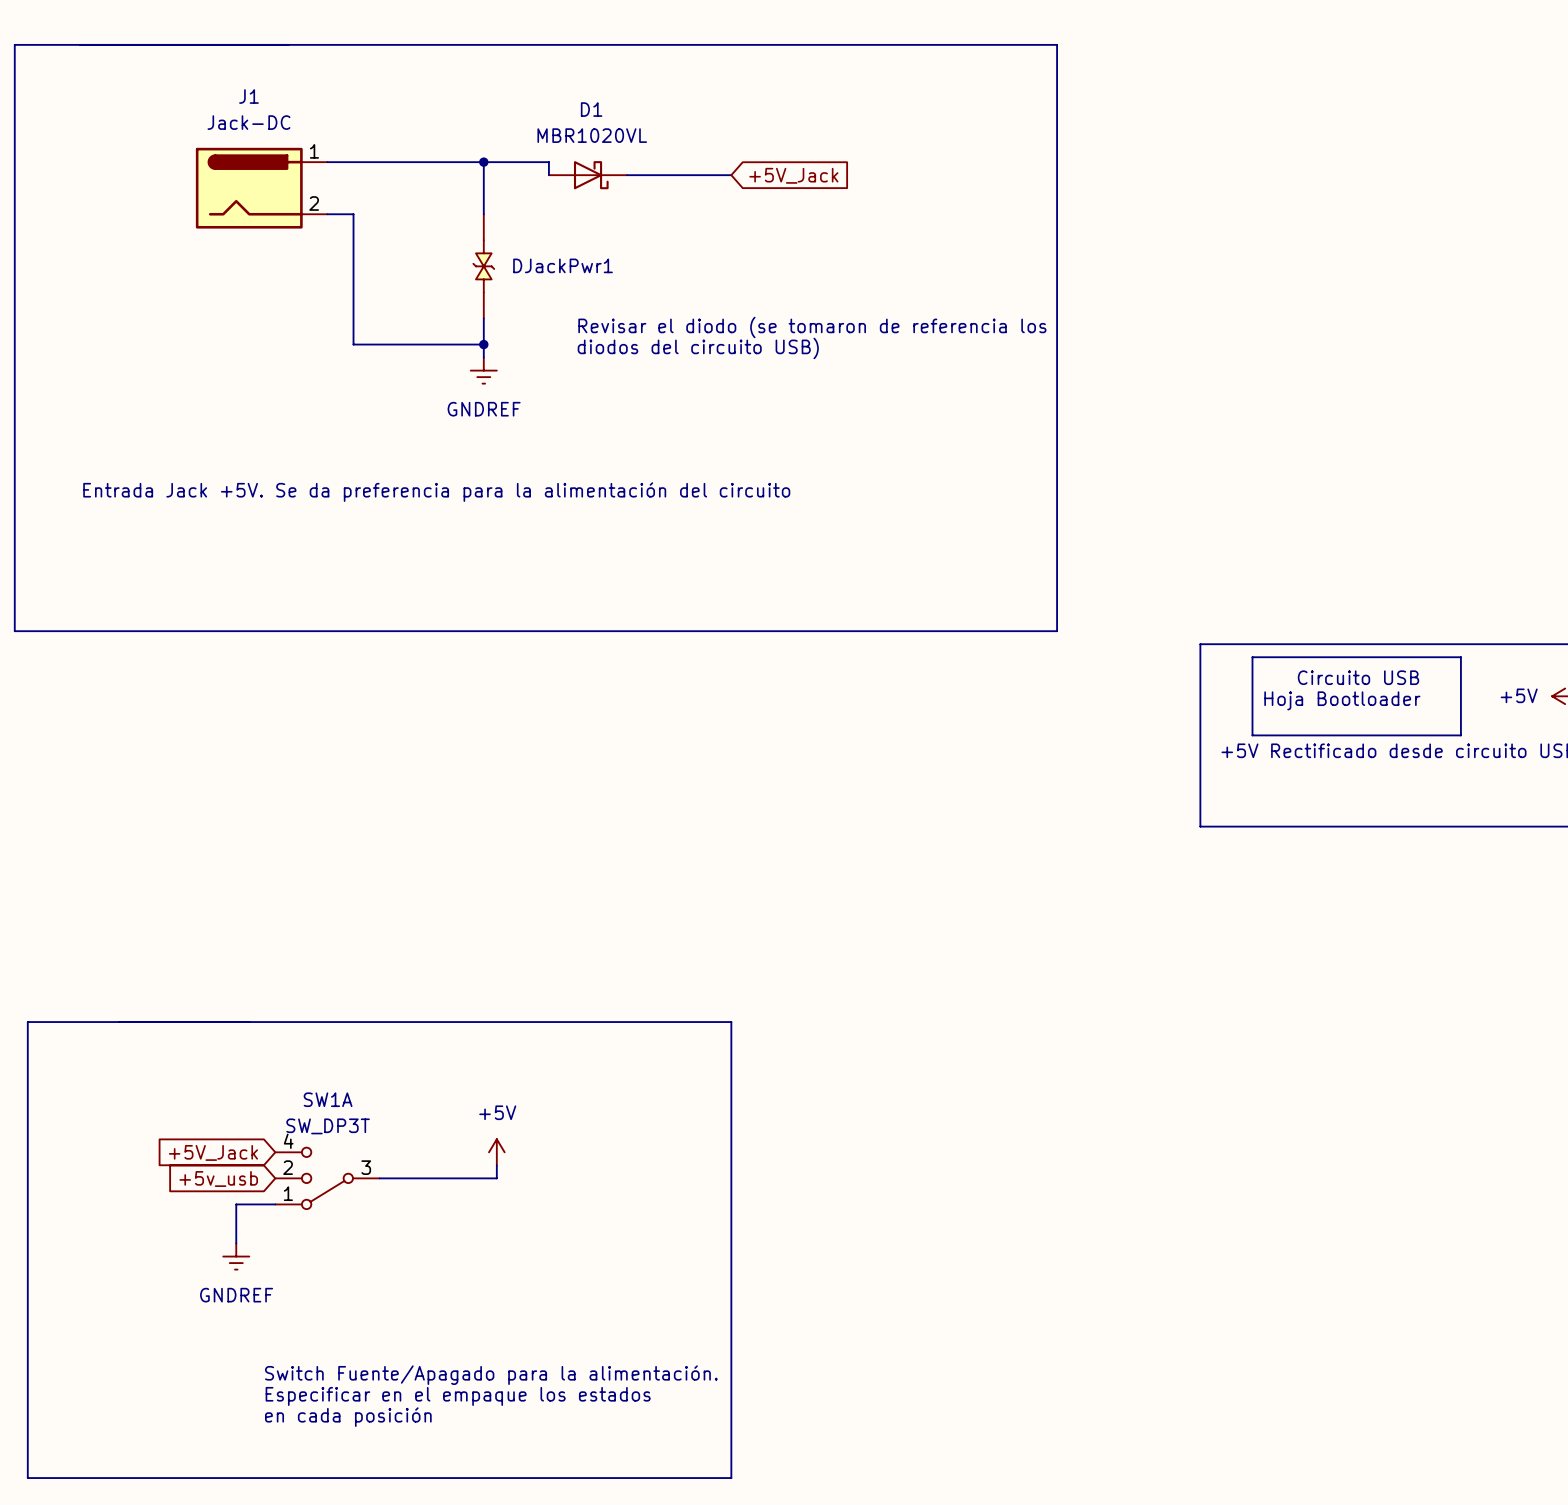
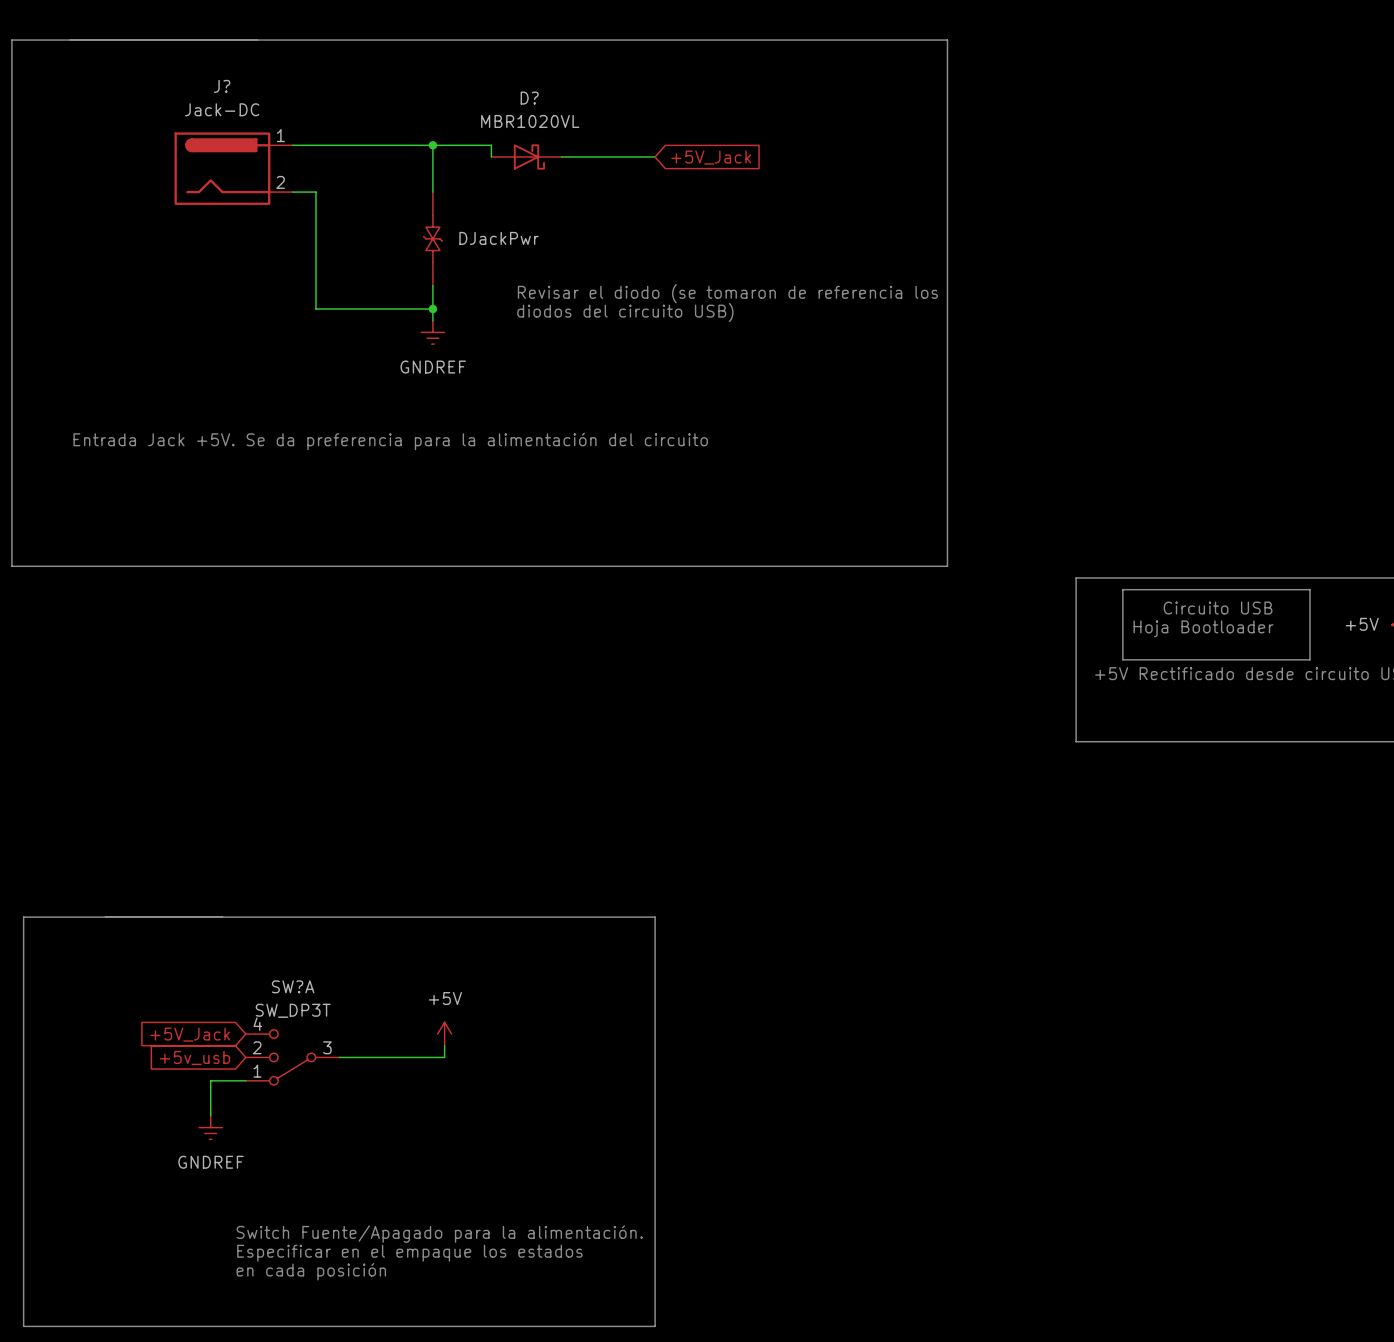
J1 name: J1 (248, 96) -> J? (222, 86)
D1 name: D1 (591, 109) -> D? (529, 98)
DJackPwr1 name: DJackPwr1 (563, 265) -> DJackPwr (499, 238)
SW1A name: SW1A (328, 1099) -> SW?A (293, 986)

